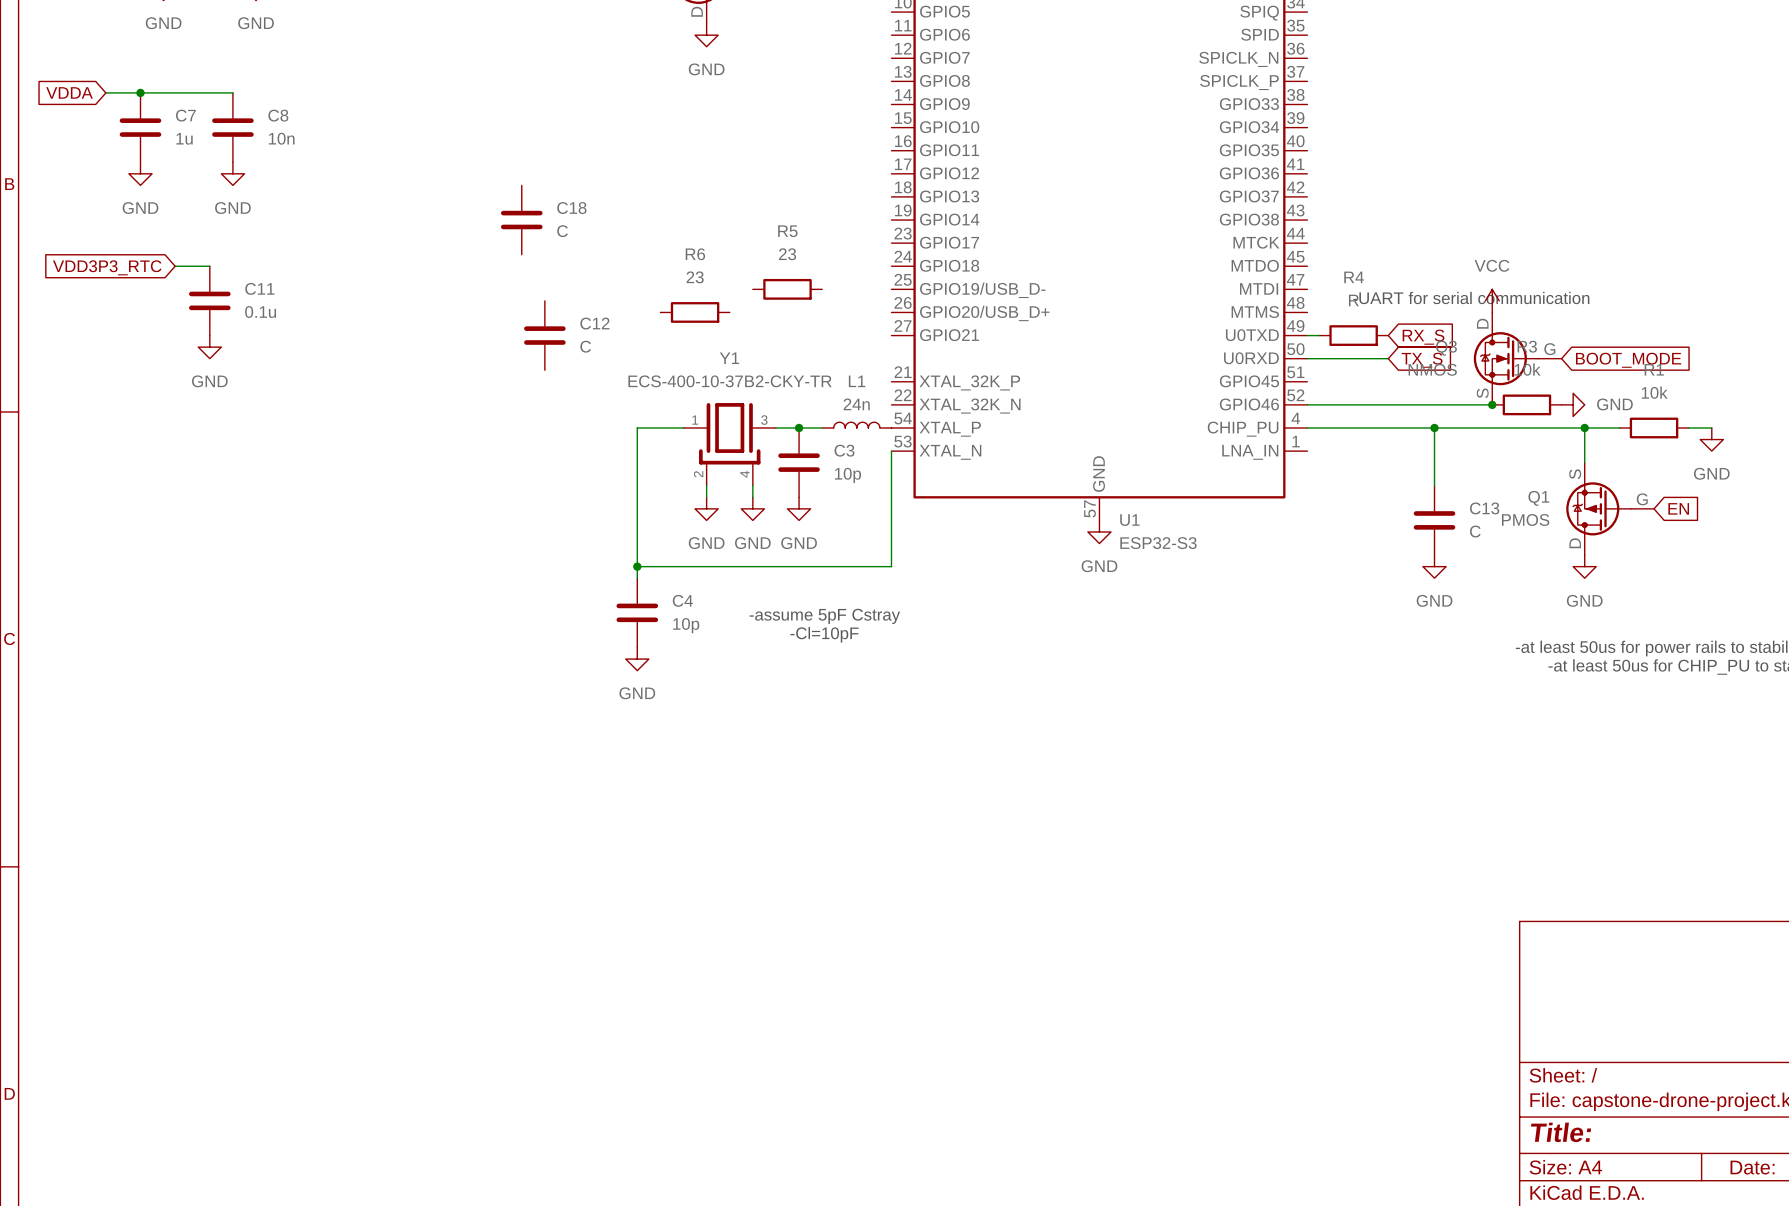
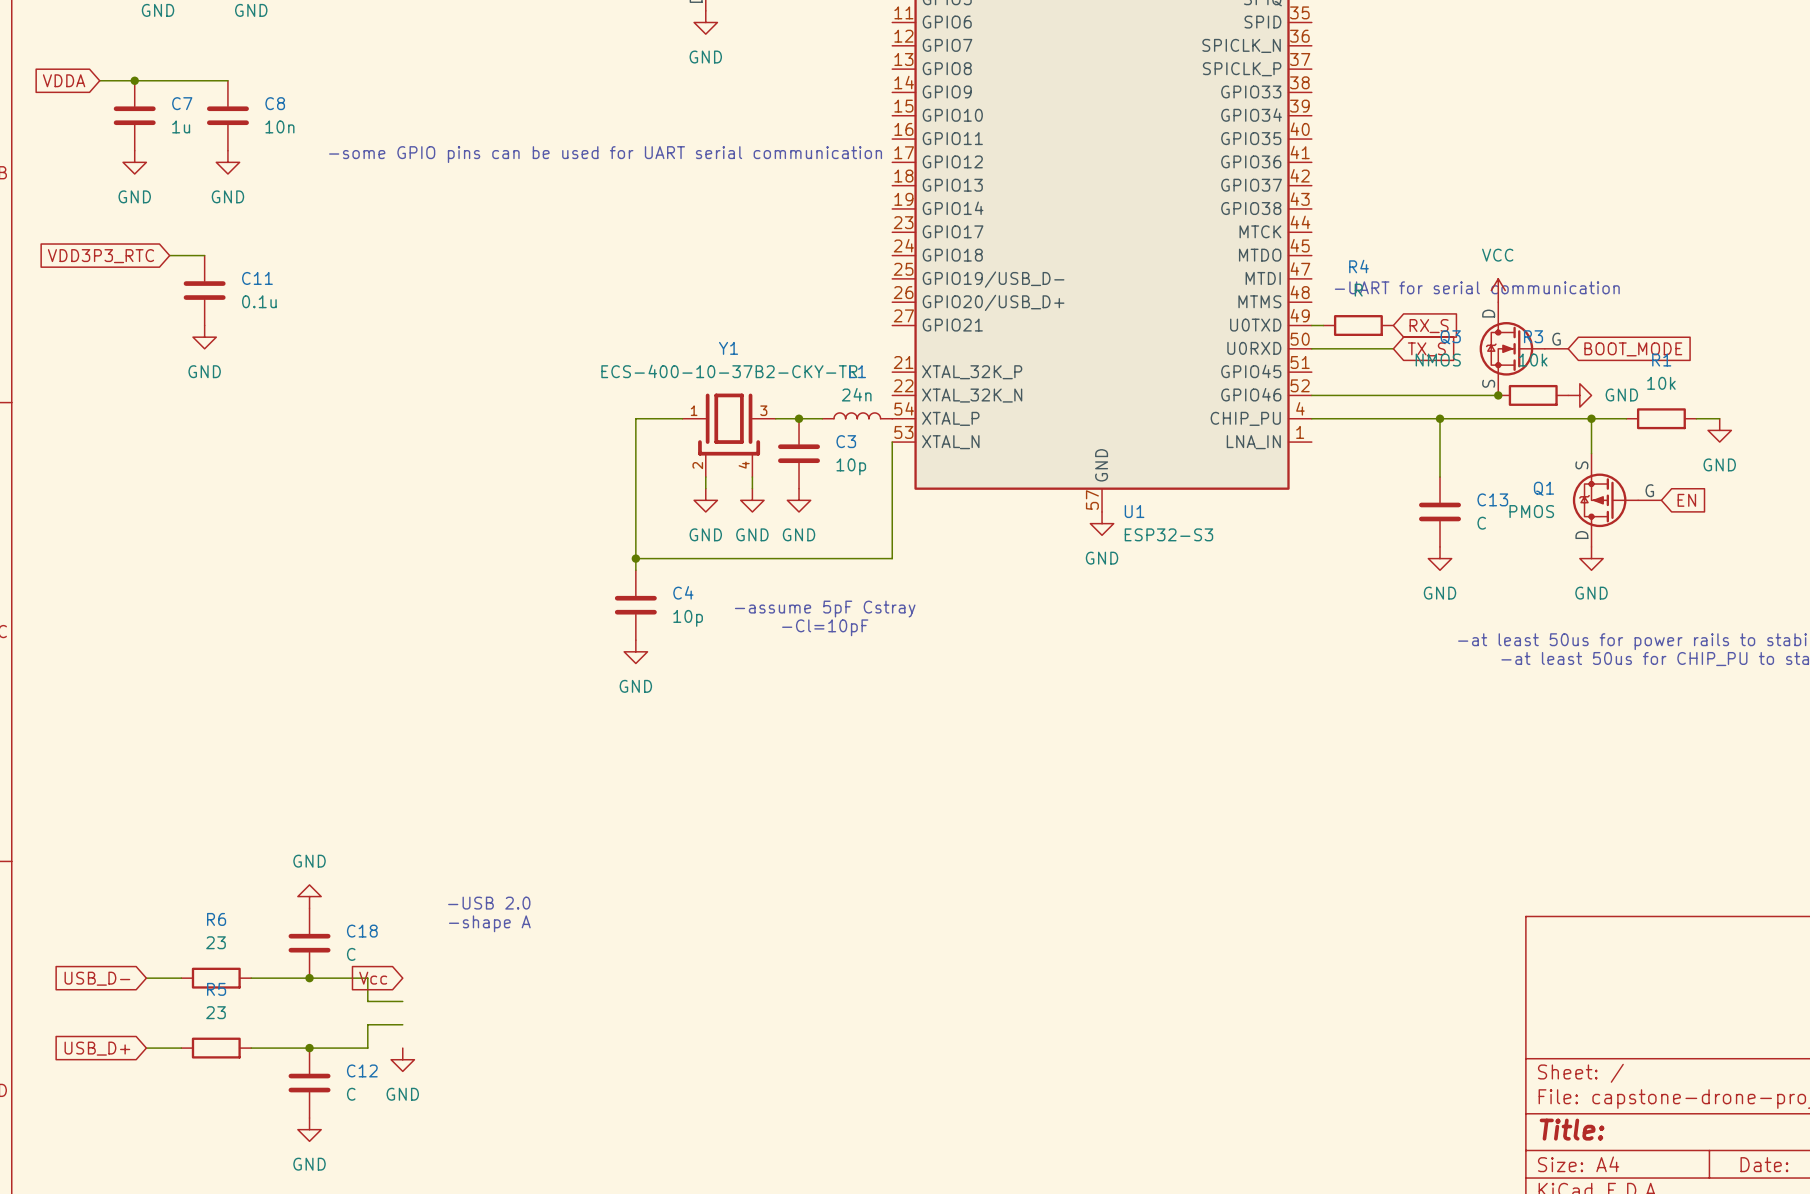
text: none -> -some GPIO pins can be used for UART serial communication (605, 154)
C18 position: (521, 220) -> (309, 943)
R5 position: (787, 289) -> (216, 1048)
R6 position: (695, 312) -> (216, 978)
C12 position: (544, 335) -> (309, 1083)
power symbol: none -> GND (309, 896)
text: none -> -USB 2.0 (489, 903)
text: none -> -shape A (489, 923)
wire: none -> (146, 978) (181, 978)
wire: none -> (251, 978) (367, 978) (367, 1001) (402, 1001)
junction: none -> (309, 978)
global label: none -> Vcc (373, 978)
global label: none -> USB_D- (97, 978)
wire: none -> (402, 1024) (367, 1024) (367, 1048) (251, 1048)
wire: none -> (146, 1048) (181, 1048)
junction: none -> (309, 1048)
global label: none -> USB_D+ (97, 1048)
power symbol: none -> GND (402, 1059)
power symbol: none -> GND (309, 1129)

